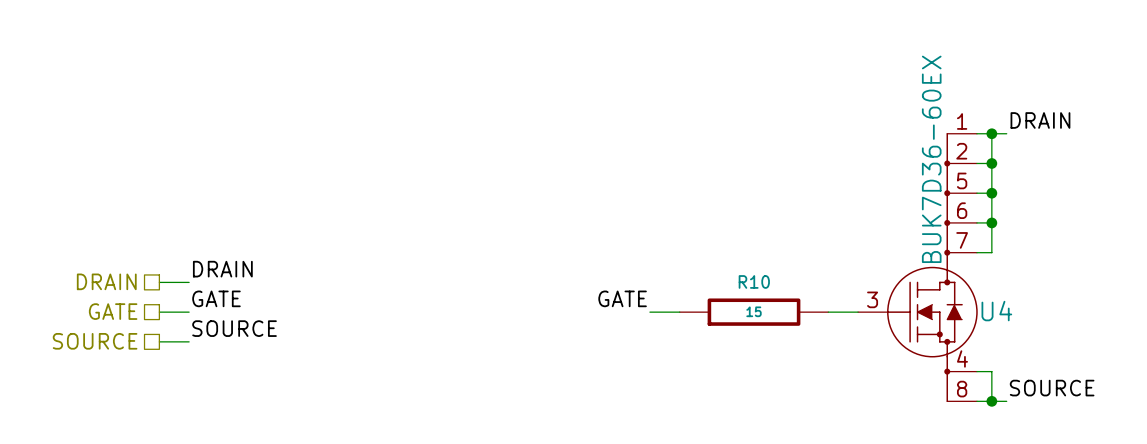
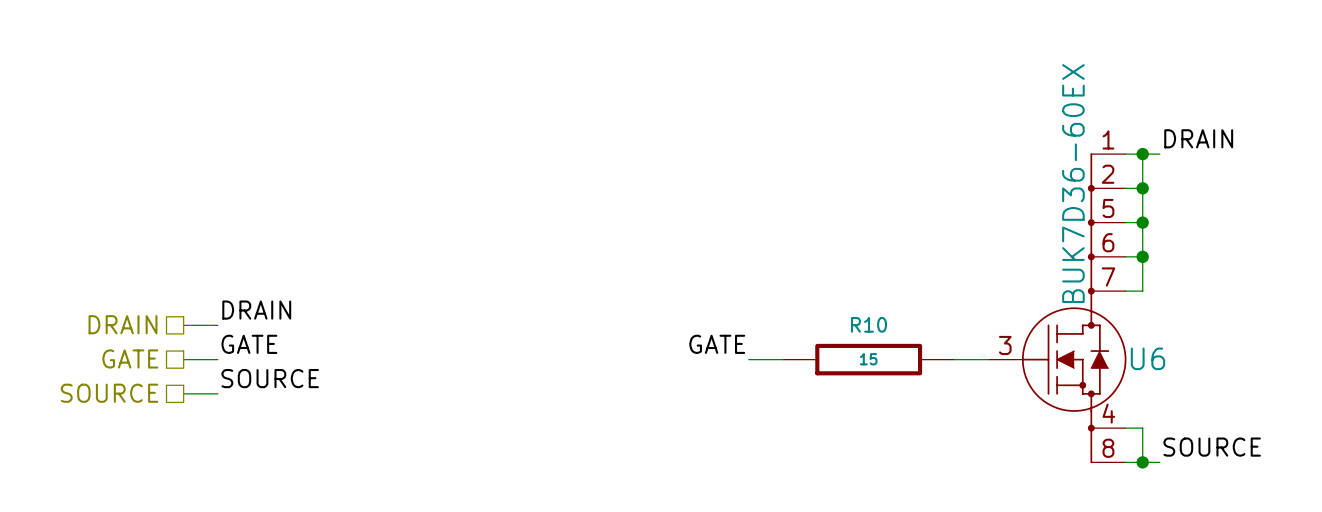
U4 name: U4 (996, 311) -> U6 (1147, 358)

